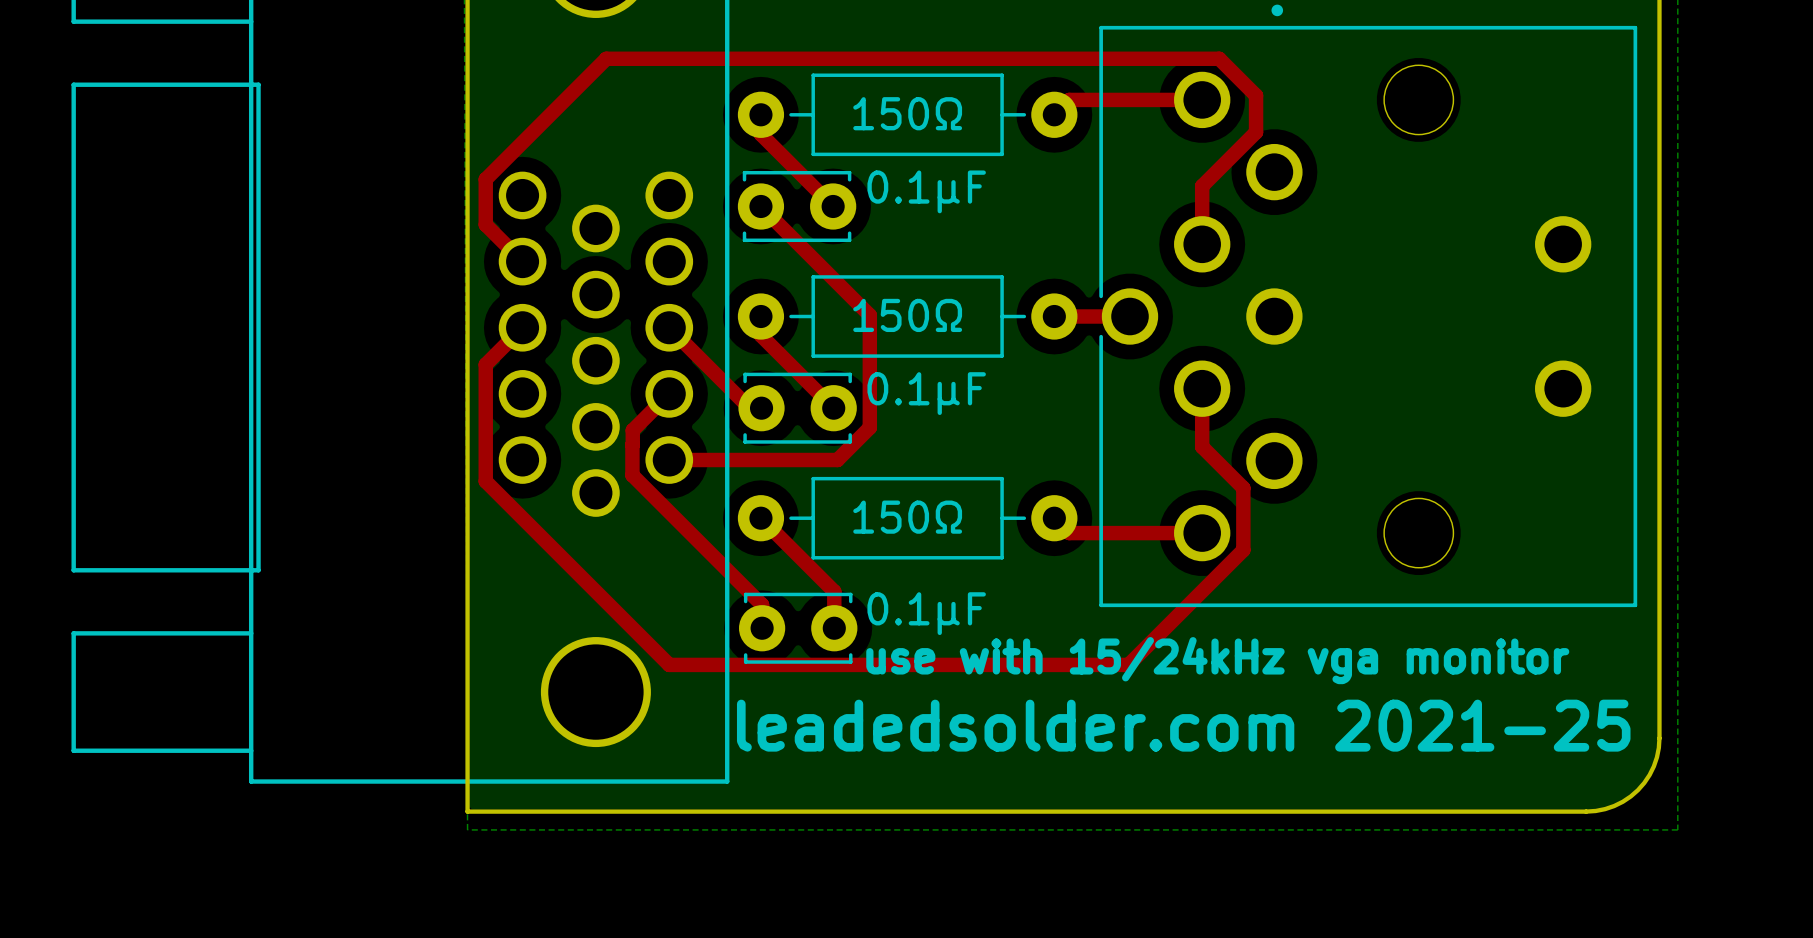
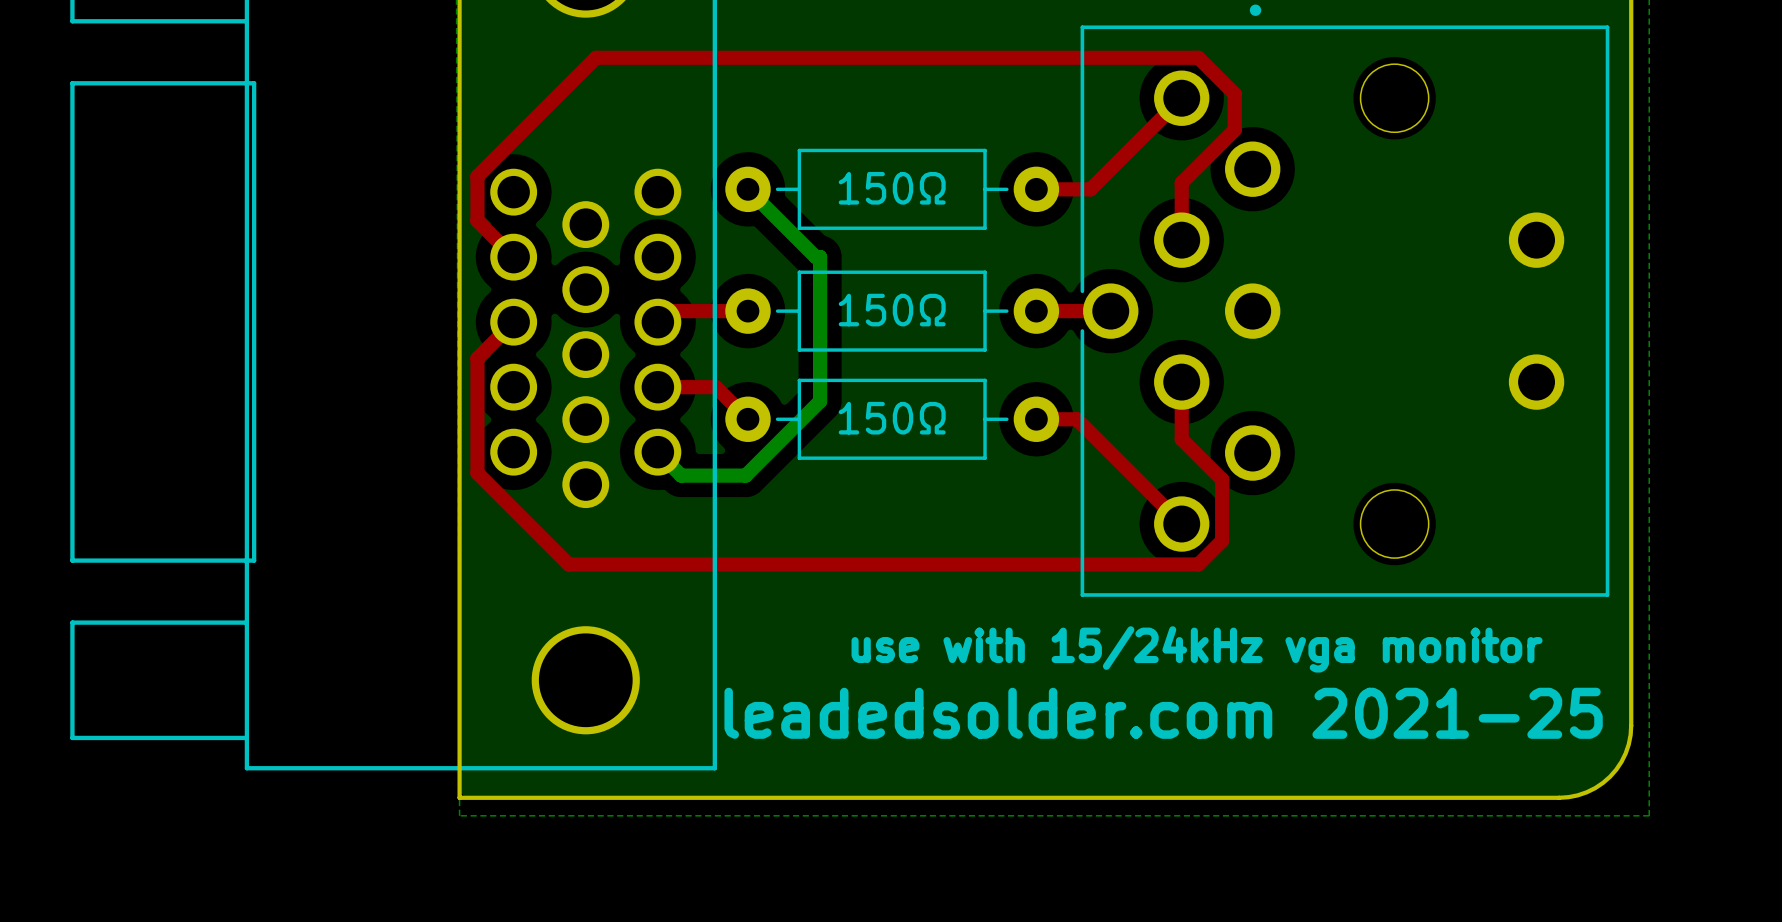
top track: (1202, 99) (1069, 99) (1054, 114) -> (1181, 98) (1090, 189) (1036, 189)
top track: (760, 114) (760, 134) (833, 206) -> none
part position: (907, 114) -> (892, 189)
bottom track: none -> (748, 189) (815, 257) (820, 257) (820, 401) (745, 475) (681, 475) (657, 452)
top track: (760, 206) (869, 315) (869, 427) (837, 460) (669, 460) -> none
part: 0.1µF (797, 206) -> none
top track: (760, 316) (760, 335) (833, 408) -> none
top track: (669, 327) (749, 408) (761, 408) -> (657, 322) (668, 311) (748, 311)
top track: (669, 393) (632, 430) (632, 444) -> (657, 387) (715, 387) (748, 419)
part: 0.1µF (797, 408) -> none
top track: (632, 445) (632, 475) (762, 604) (762, 628) -> none
top track: (760, 518) (834, 591) (834, 628) -> none
part position: (907, 518) -> (892, 419)
top track: (1054, 518) (1069, 533) (1202, 533) -> (1036, 419) (1076, 419) (1181, 524)
top track: (578, 574) (669, 664) (1128, 664) (1219, 574) -> (568, 564) (1198, 564)
part: 0.1µF (798, 628) -> none

